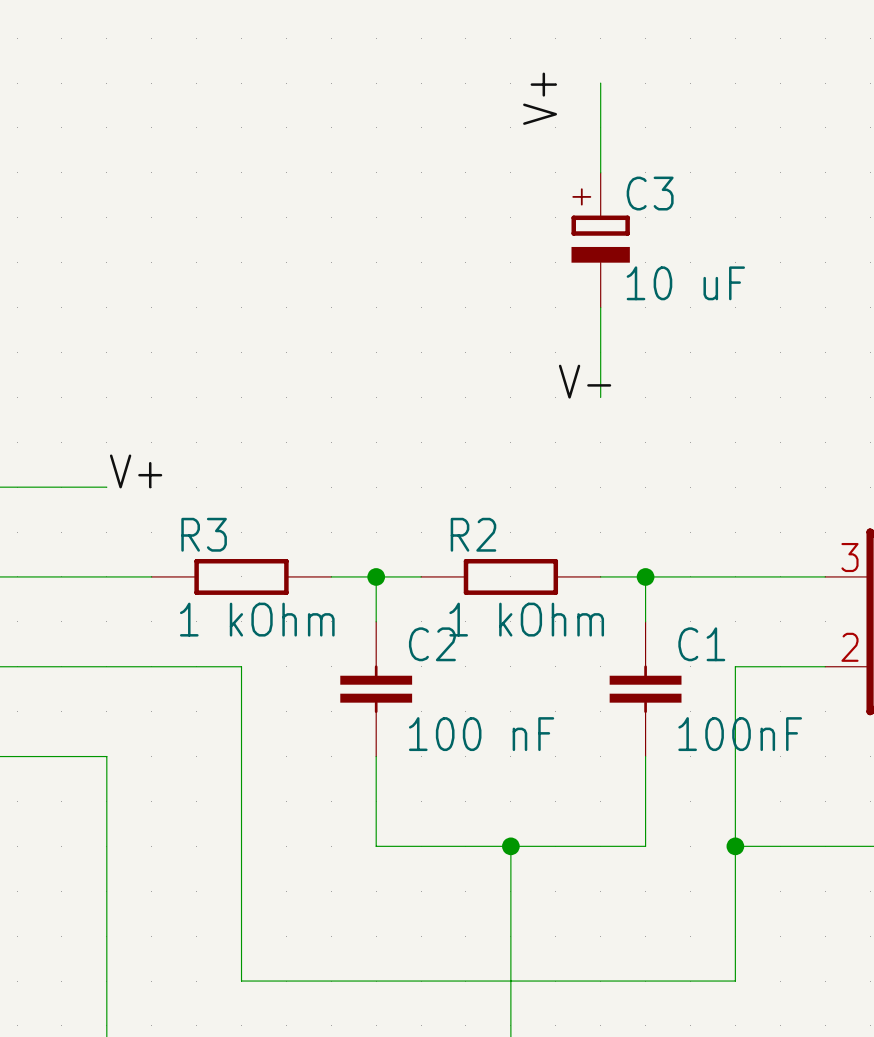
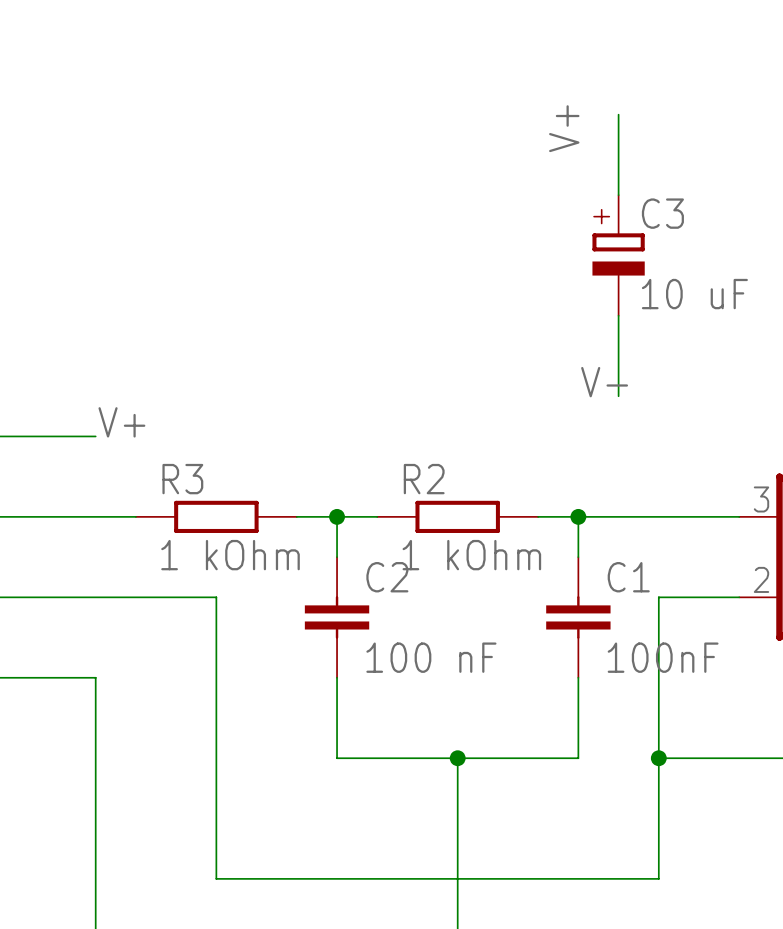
wire: (600, 83) (600, 172) -> (618, 114) (618, 195)
label position: V+ (540, 98) -> V+ (564, 128)
C3 position: (600, 240) -> (618, 255)
wire: (600, 307) (600, 397) -> (618, 315) (618, 396)
label position: V- (585, 381) -> V- (604, 382)

